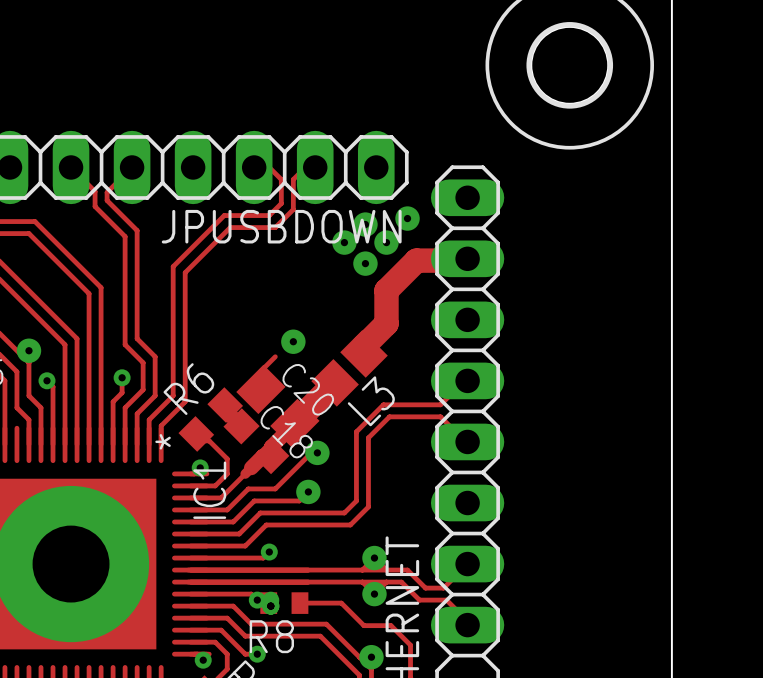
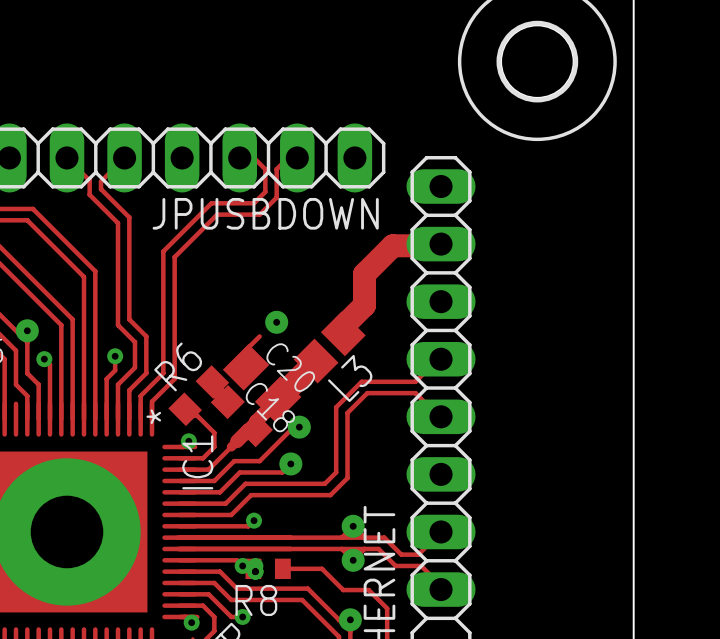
via: (407, 218) -> none
via: (365, 224) -> none
via: (344, 242) -> none
via: (386, 242) -> none
via: (365, 263) -> none

